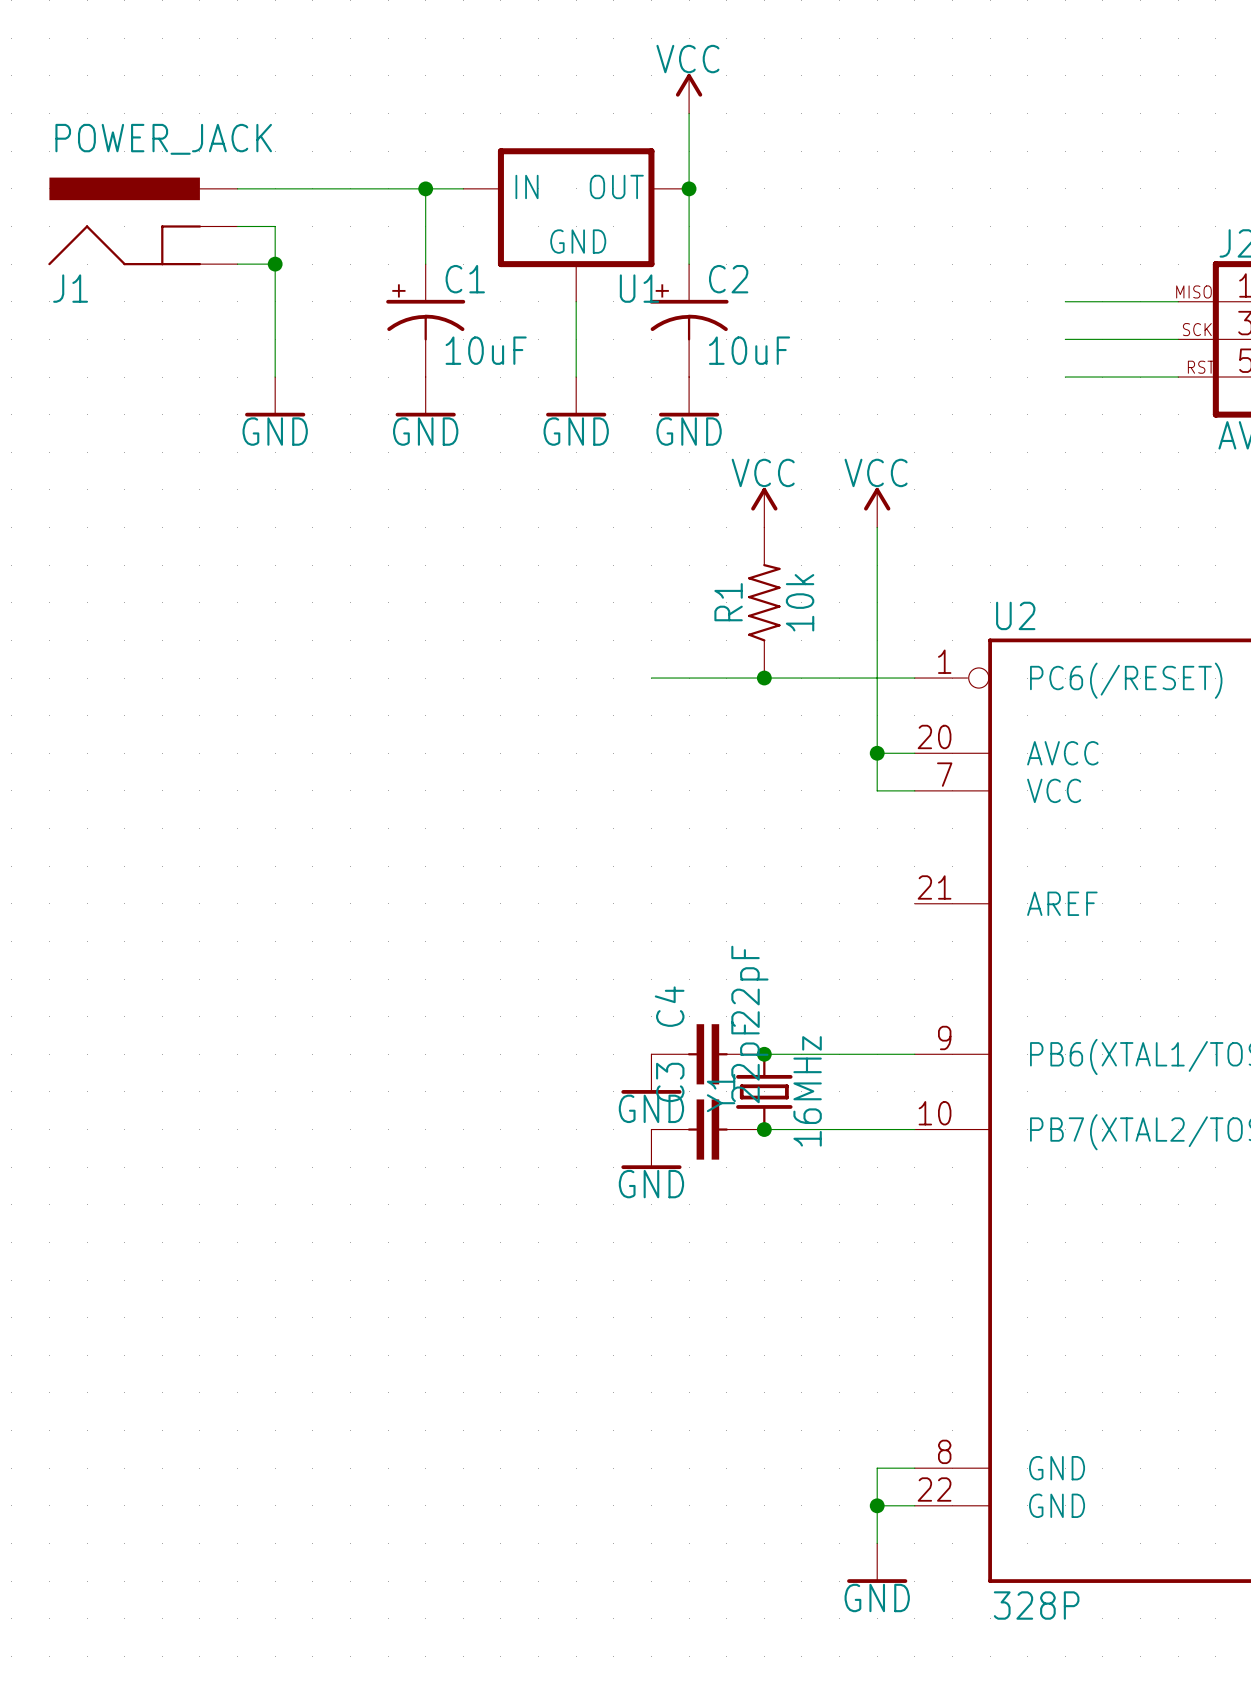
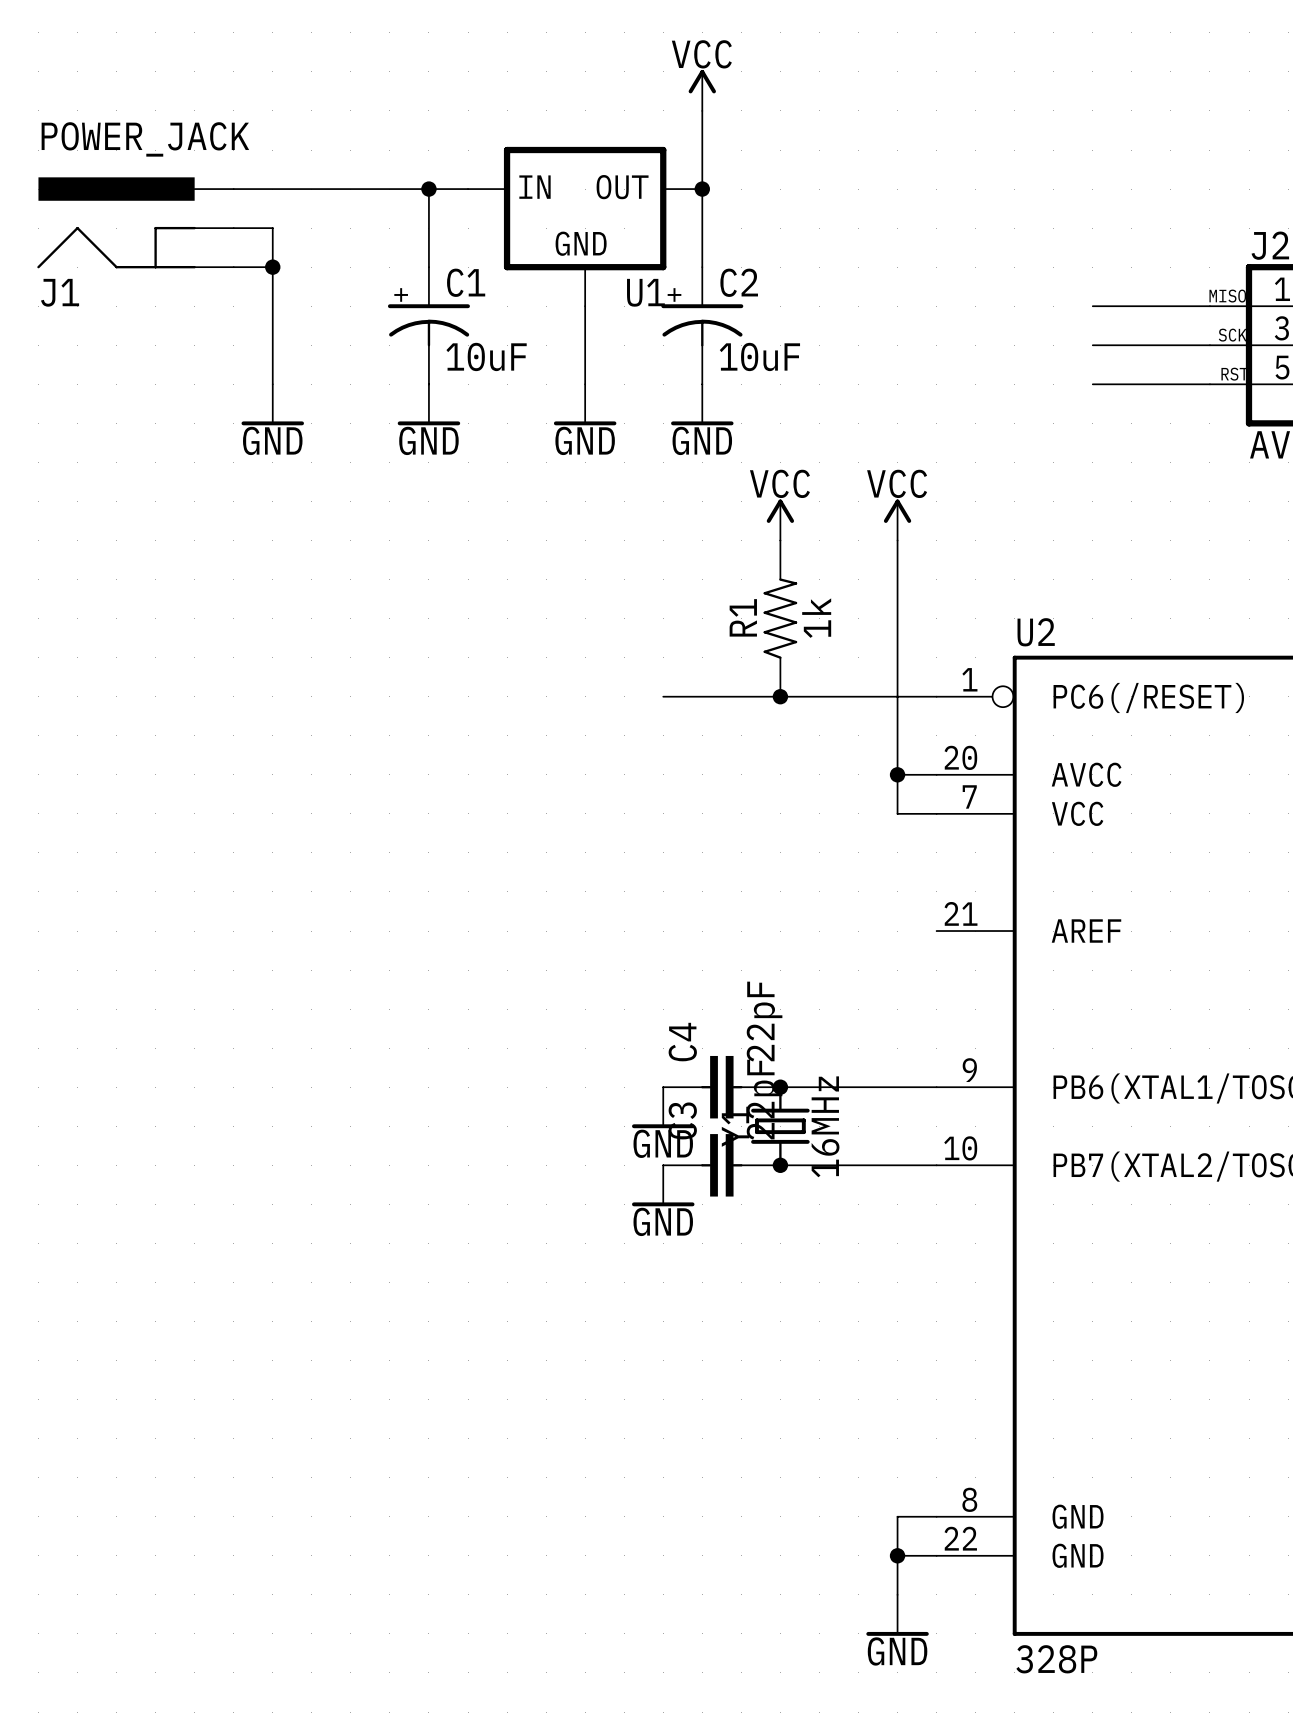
R1 value: 10k (800, 602) -> 1k (816, 618)

